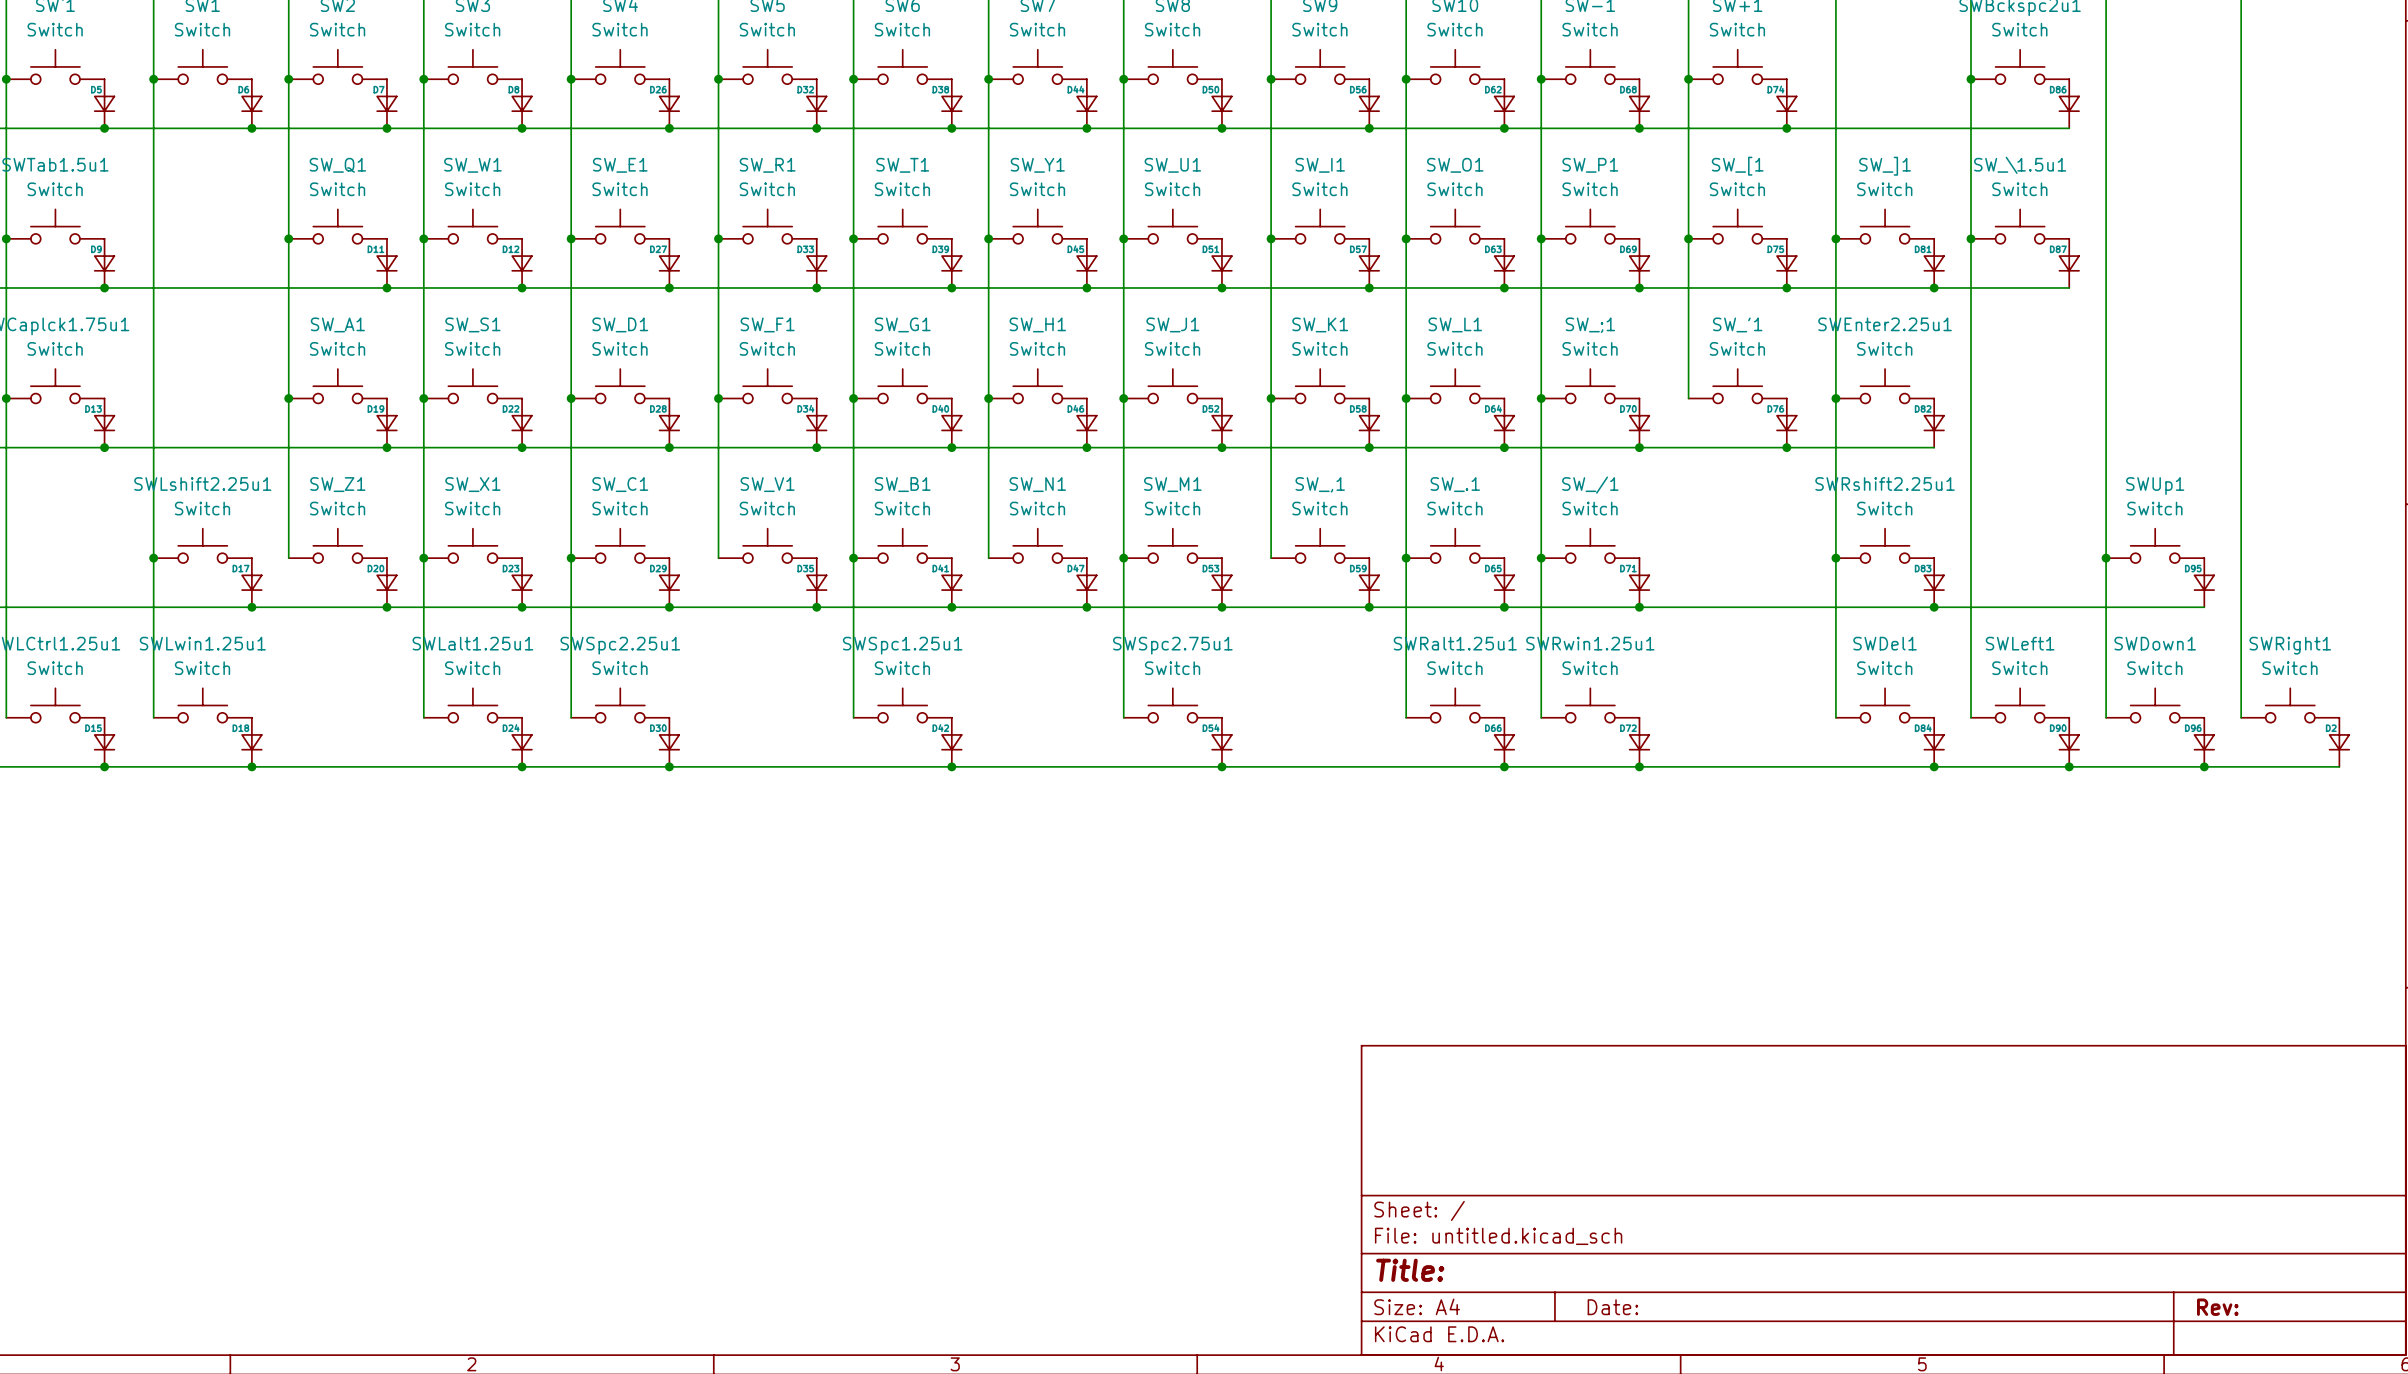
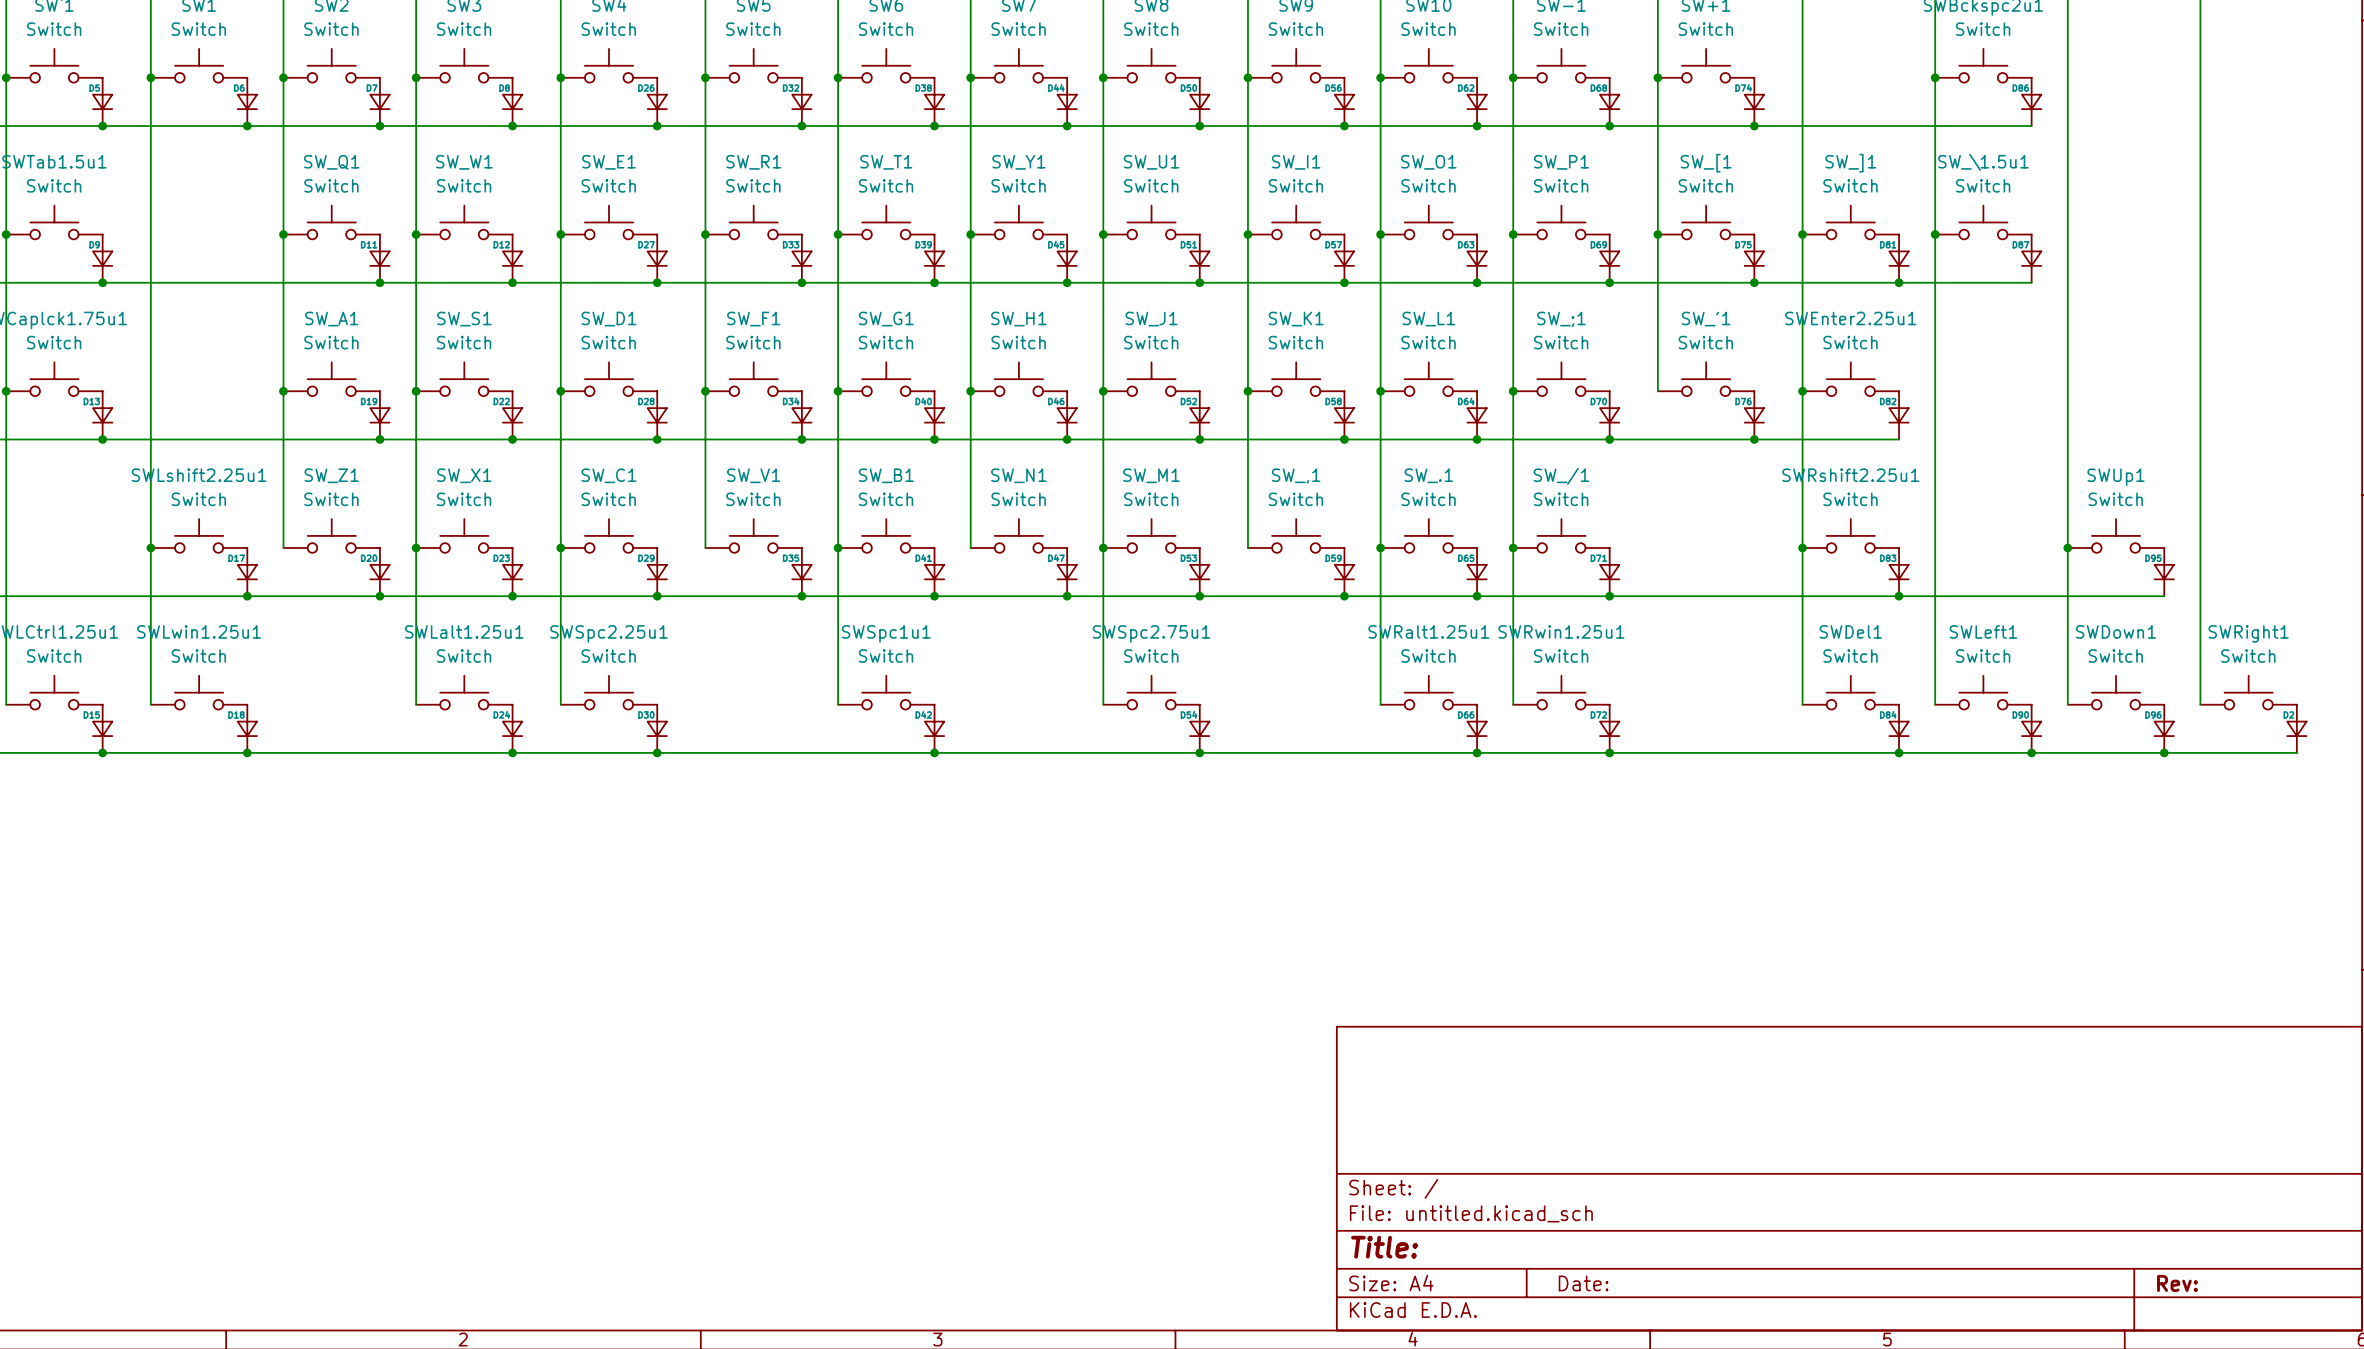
SWSpc1.25u1 name: SWSpc1.25u1 (902, 645) -> SWSpc1u1 (886, 633)

